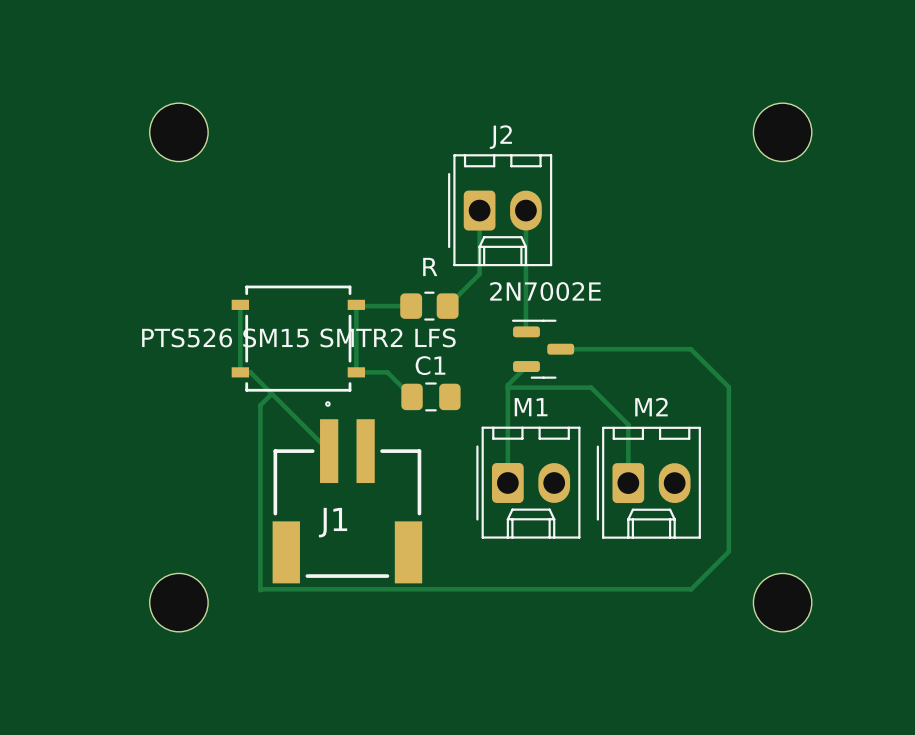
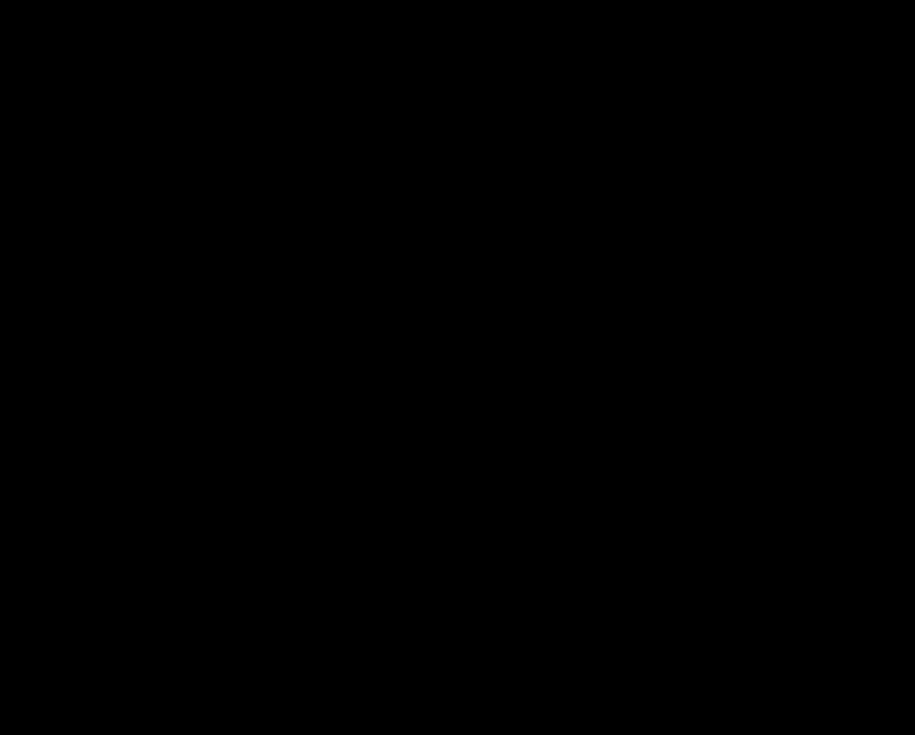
part: (178, 132) -> none
part: (782, 132) -> none
track: (479, 210) (479, 274) (447, 306) -> none
J2: (500, 210) -> none
track: (525, 210) (526, 331) -> none
track: (240, 304) (240, 372) (250, 372) (329, 451) -> none
track: (411, 306) (356, 304) (356, 372) (387, 372) (412, 396) -> none
part: R (429, 306) -> none
part: PTS526 SM15 SMTR2 LFS (298, 338) -> none
part: 2N7002E (543, 349) -> none
track: (560, 349) (690, 349) (728, 387) (728, 551) (691, 589) (260, 590) (260, 405) (271, 393) -> none
track: (526, 366) (507, 385) (507, 482) -> none
track: (507, 387) (591, 387) (628, 424) (628, 483) -> none
C1: (430, 396) -> none
M1: (528, 482) -> none
M2: (648, 482) -> none
J1: (347, 492) -> none
part: (178, 602) -> none
part: (782, 602) -> none

